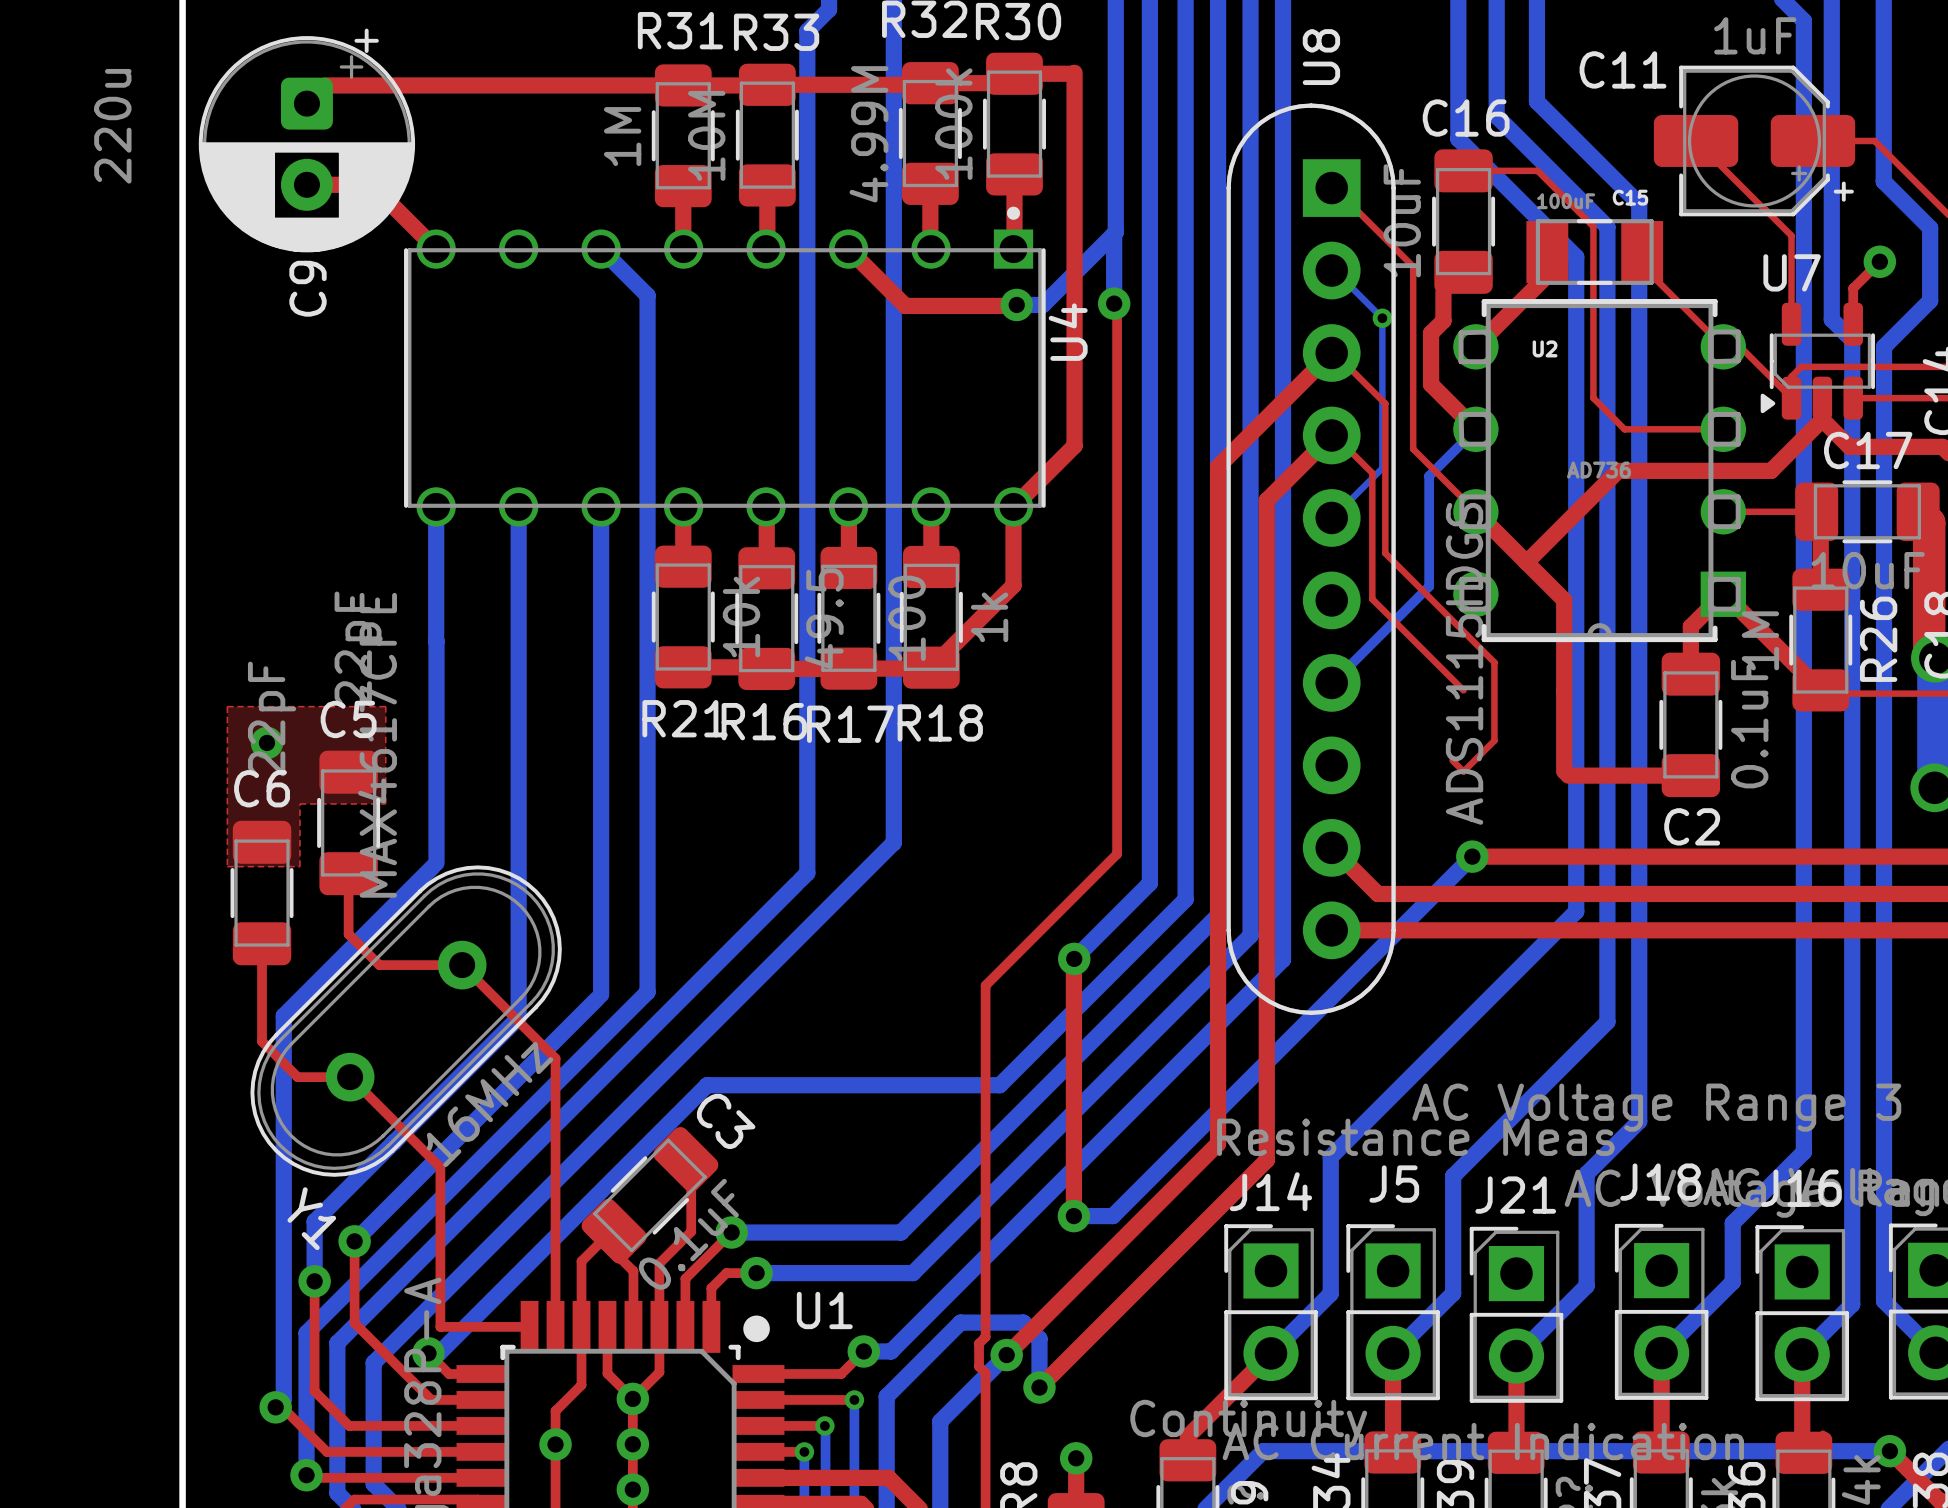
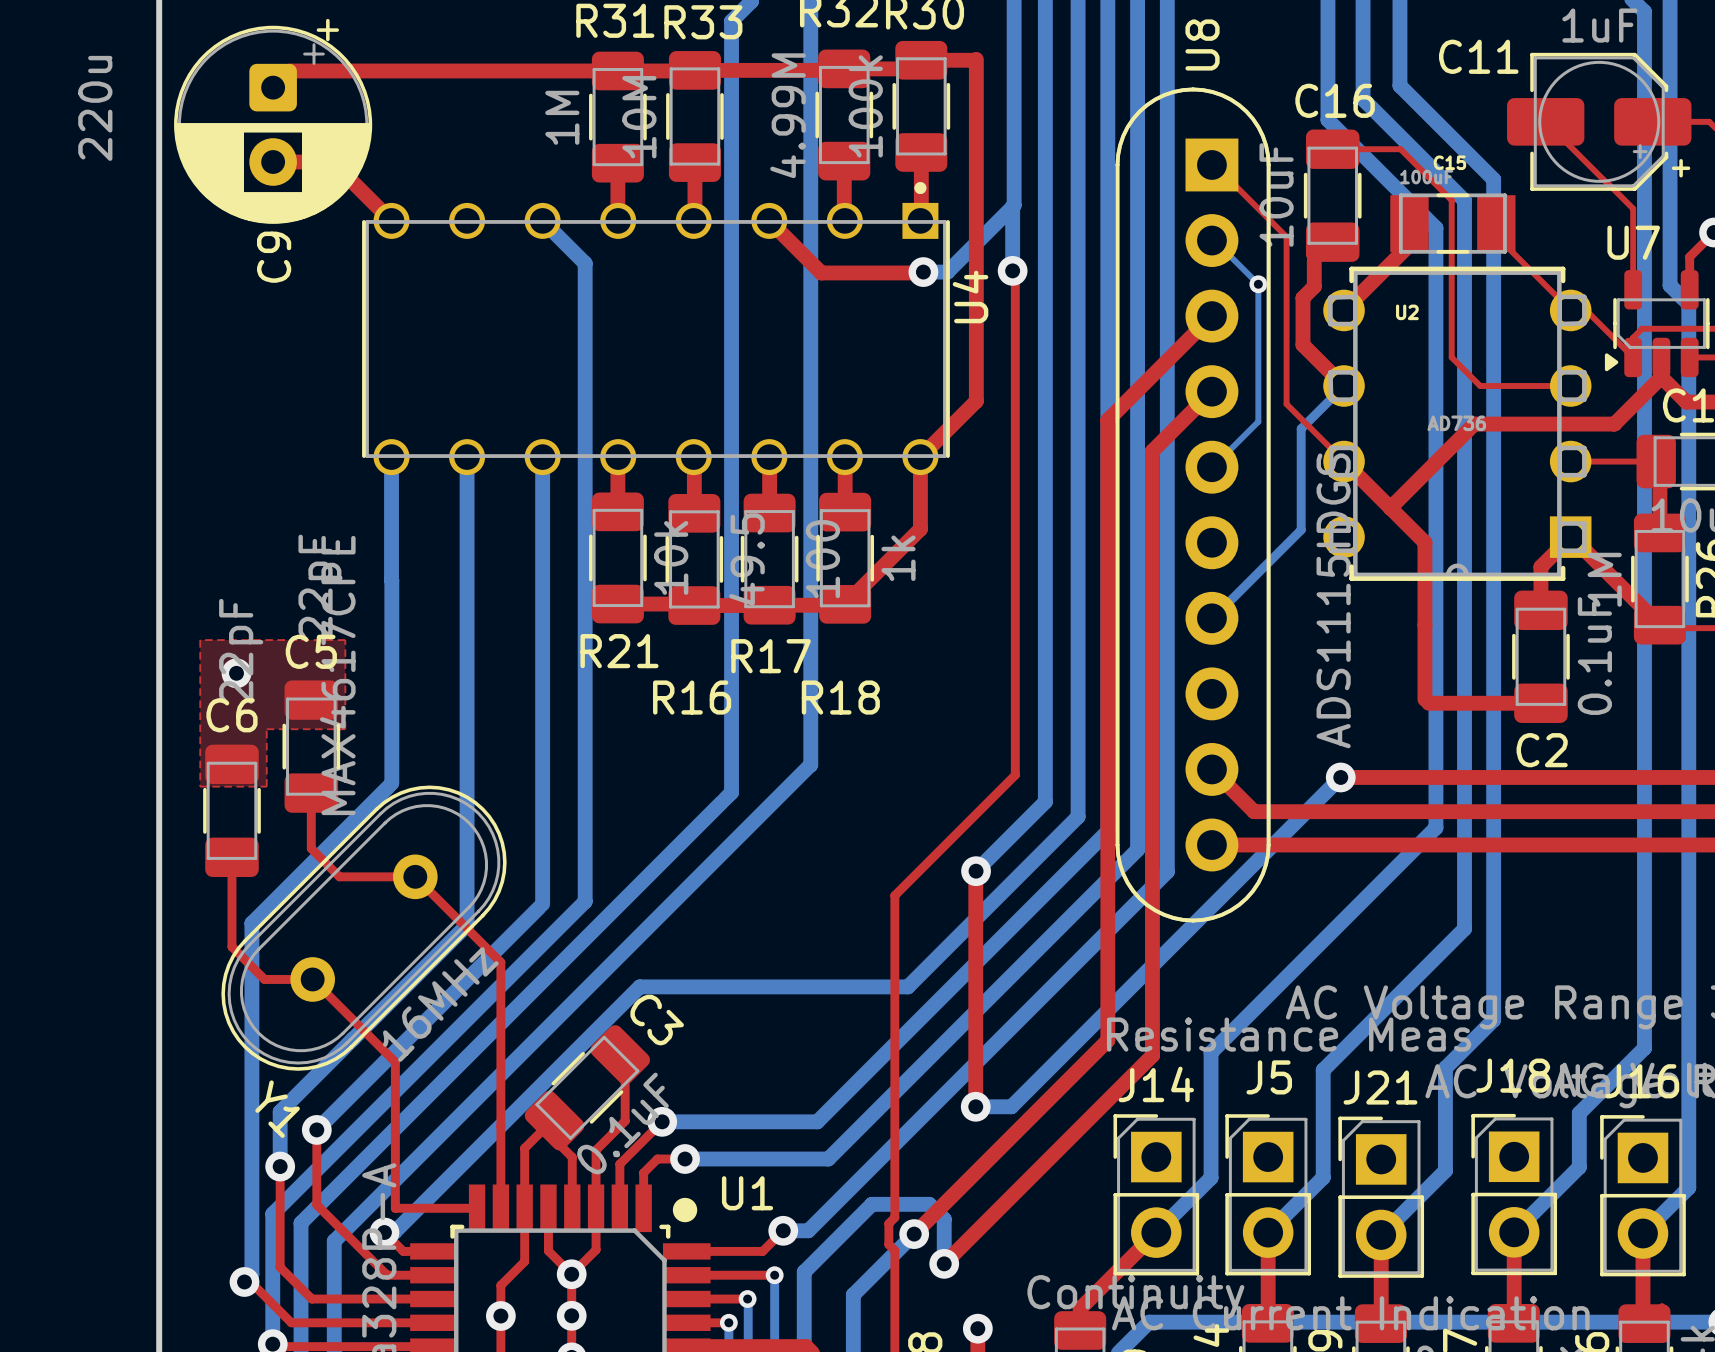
C15 name position: C15 (1630, 197) -> C15 (1449, 162)
top track: (1333, 352) (1385, 403) (1385, 553) (1494, 662) (1494, 740) (1463, 771) (1452, 760) -> none
top track: (1333, 434) (1372, 473) (1372, 599) (1463, 690) -> none
R16 name position: R16 (764, 721) -> R16 (692, 697)
R18 name position: R18 (940, 722) -> R18 (840, 697)

